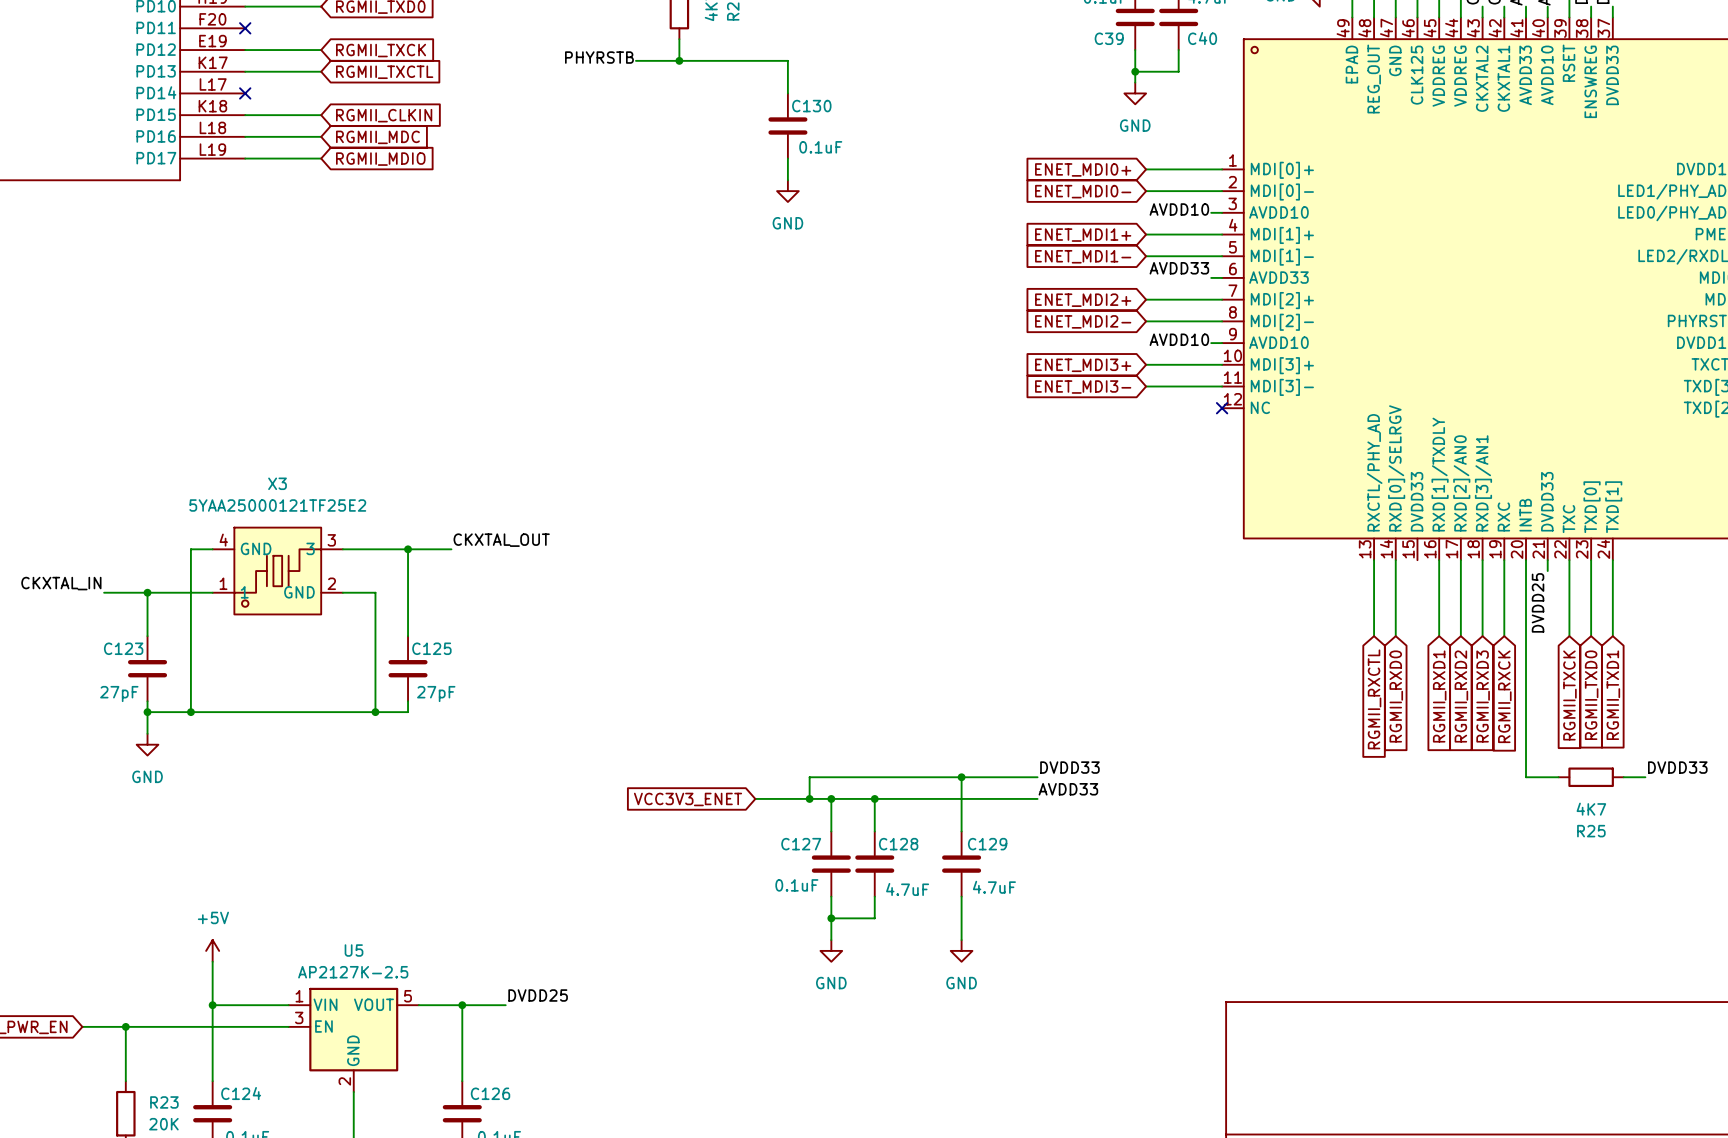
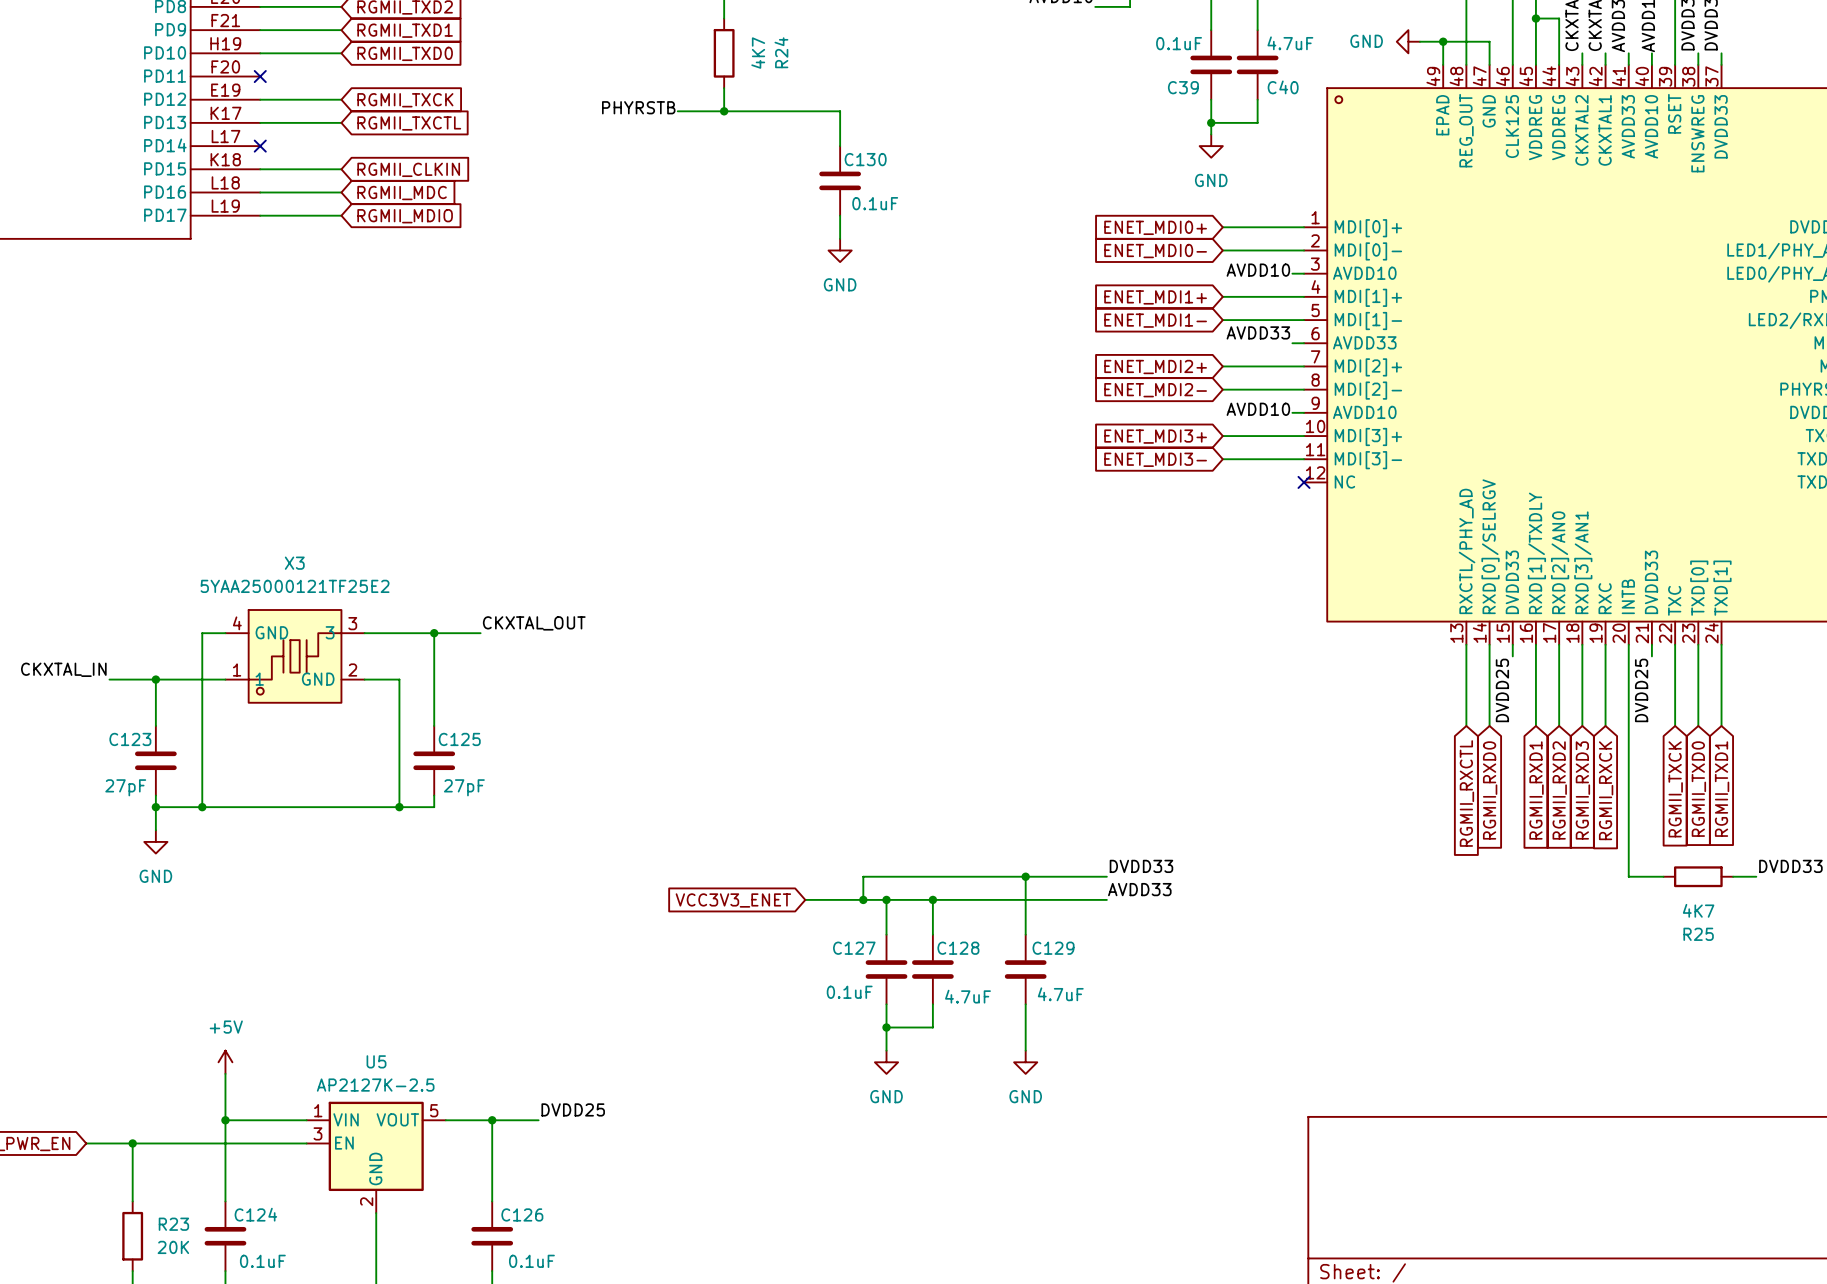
wire: none -> (1512, 644) (1512, 656)
label: none -> DVDD25 (1502, 690)

